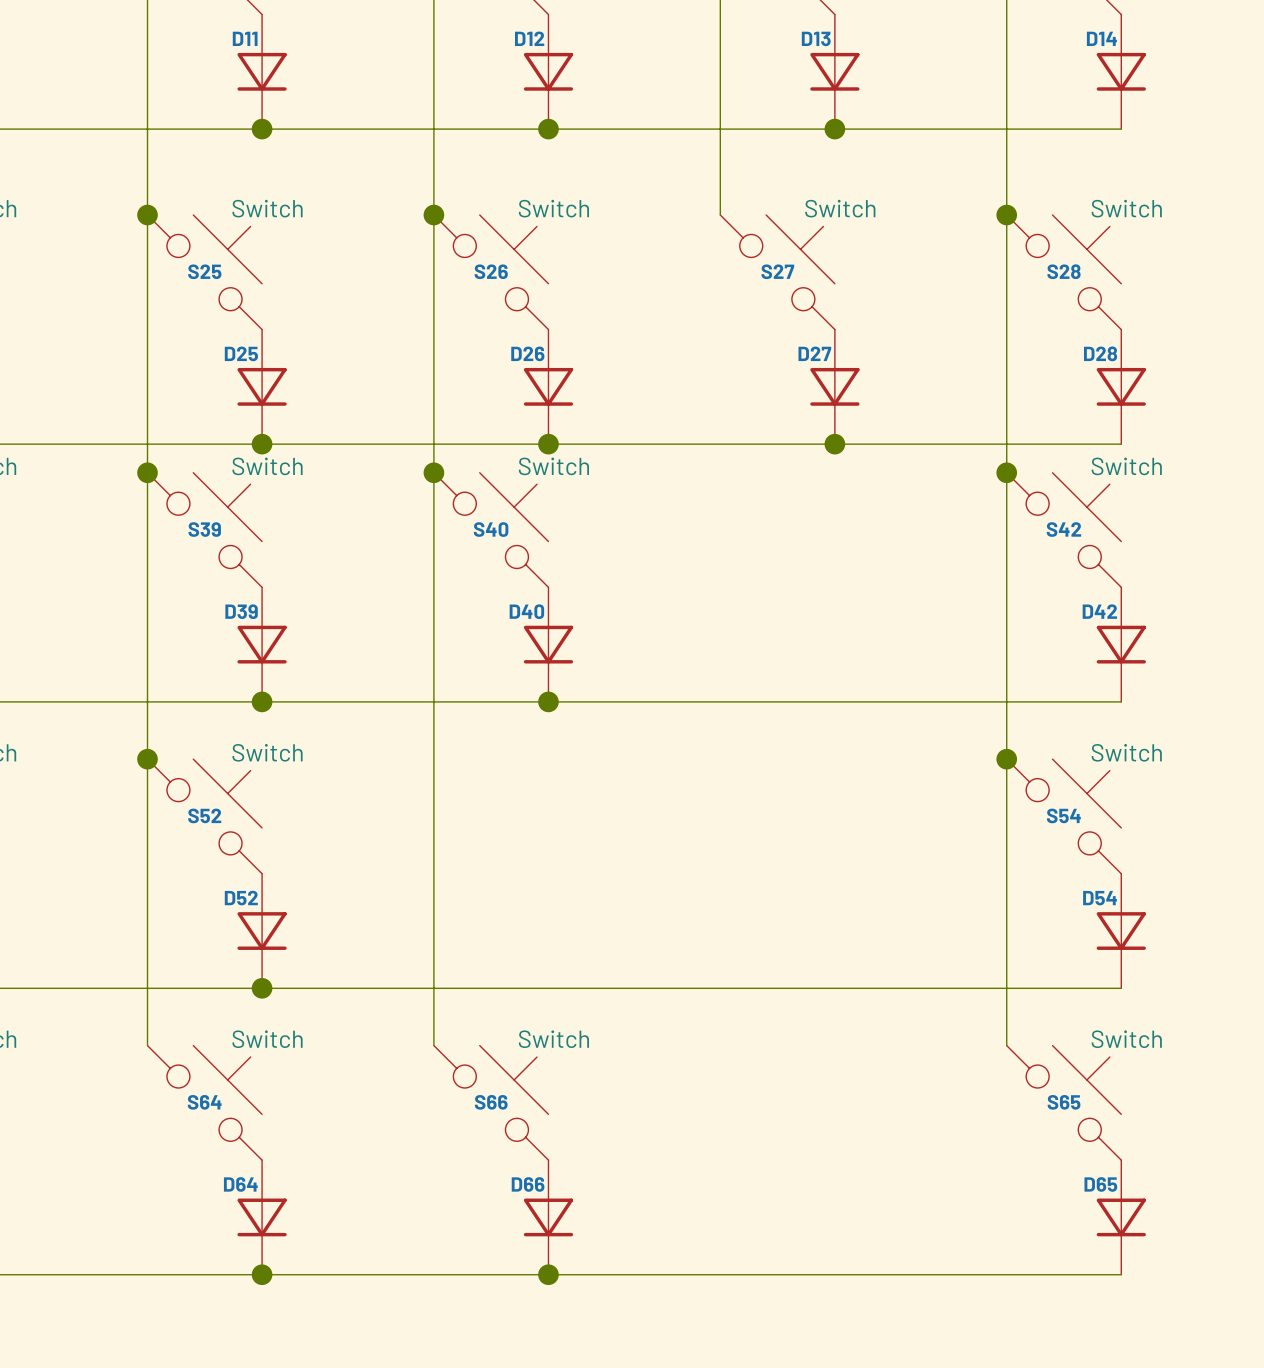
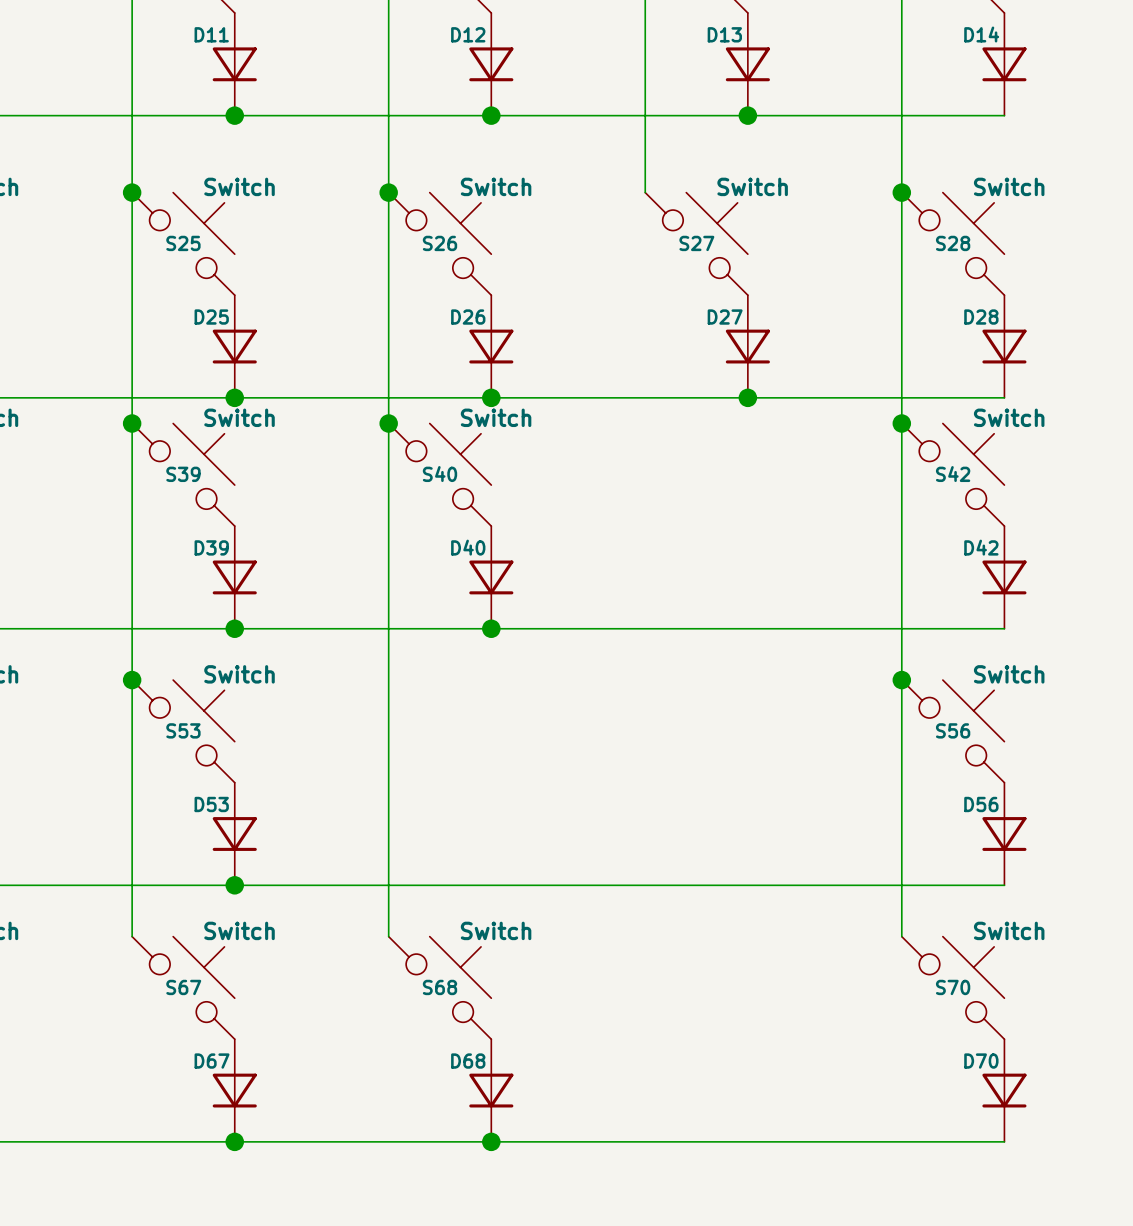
S52 name: S52 (204, 815) -> S53 (183, 730)
S54 name: S54 (1063, 815) -> S56 (953, 730)
D52 name: D52 (241, 898) -> D53 (211, 804)
D54 name: D54 (1100, 898) -> D56 (981, 804)
S64 name: S64 (204, 1102) -> S67 (183, 987)
S66 name: S66 (491, 1102) -> S68 (440, 987)
S65 name: S65 (1064, 1102) -> S70 (953, 987)
D64 name: D64 (240, 1184) -> D67 (212, 1061)
D66 name: D66 (528, 1184) -> D68 (468, 1061)
D65 name: D65 (1100, 1184) -> D70 (981, 1061)

